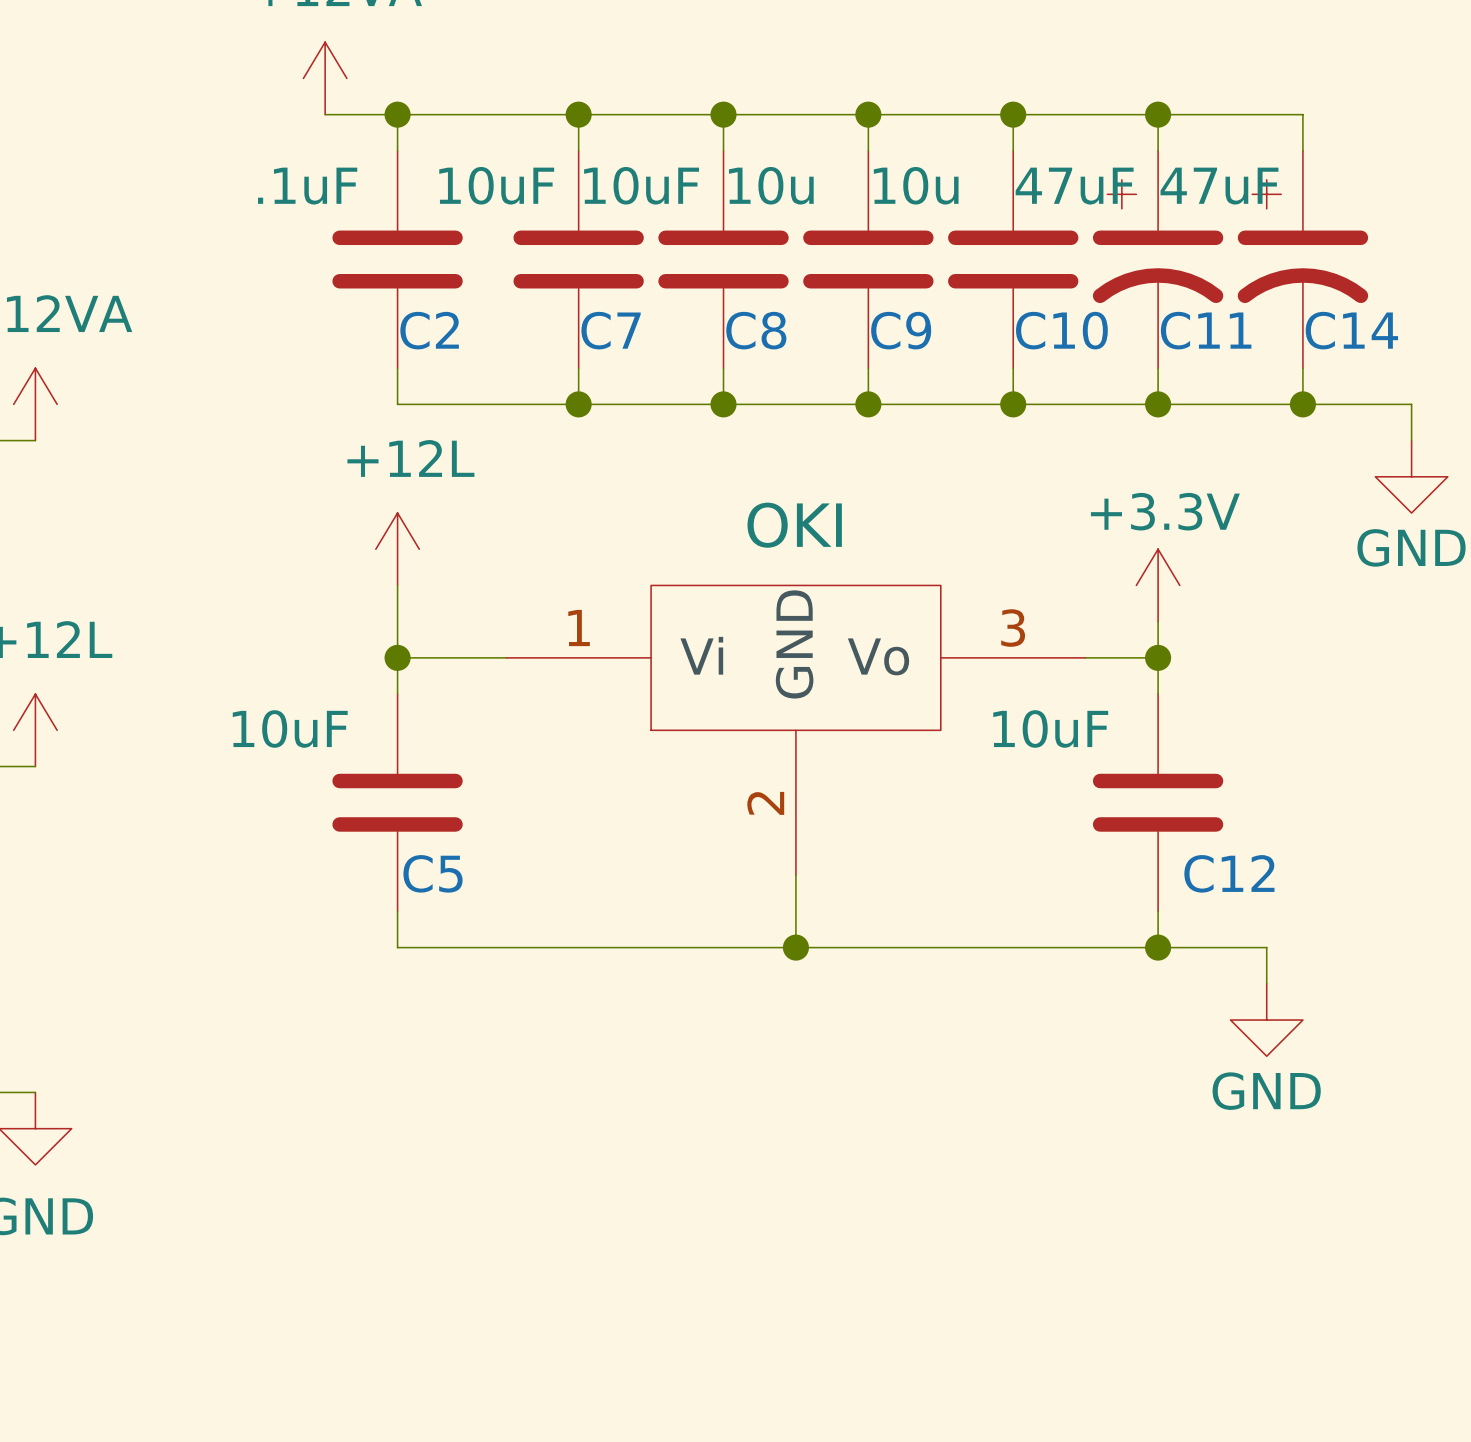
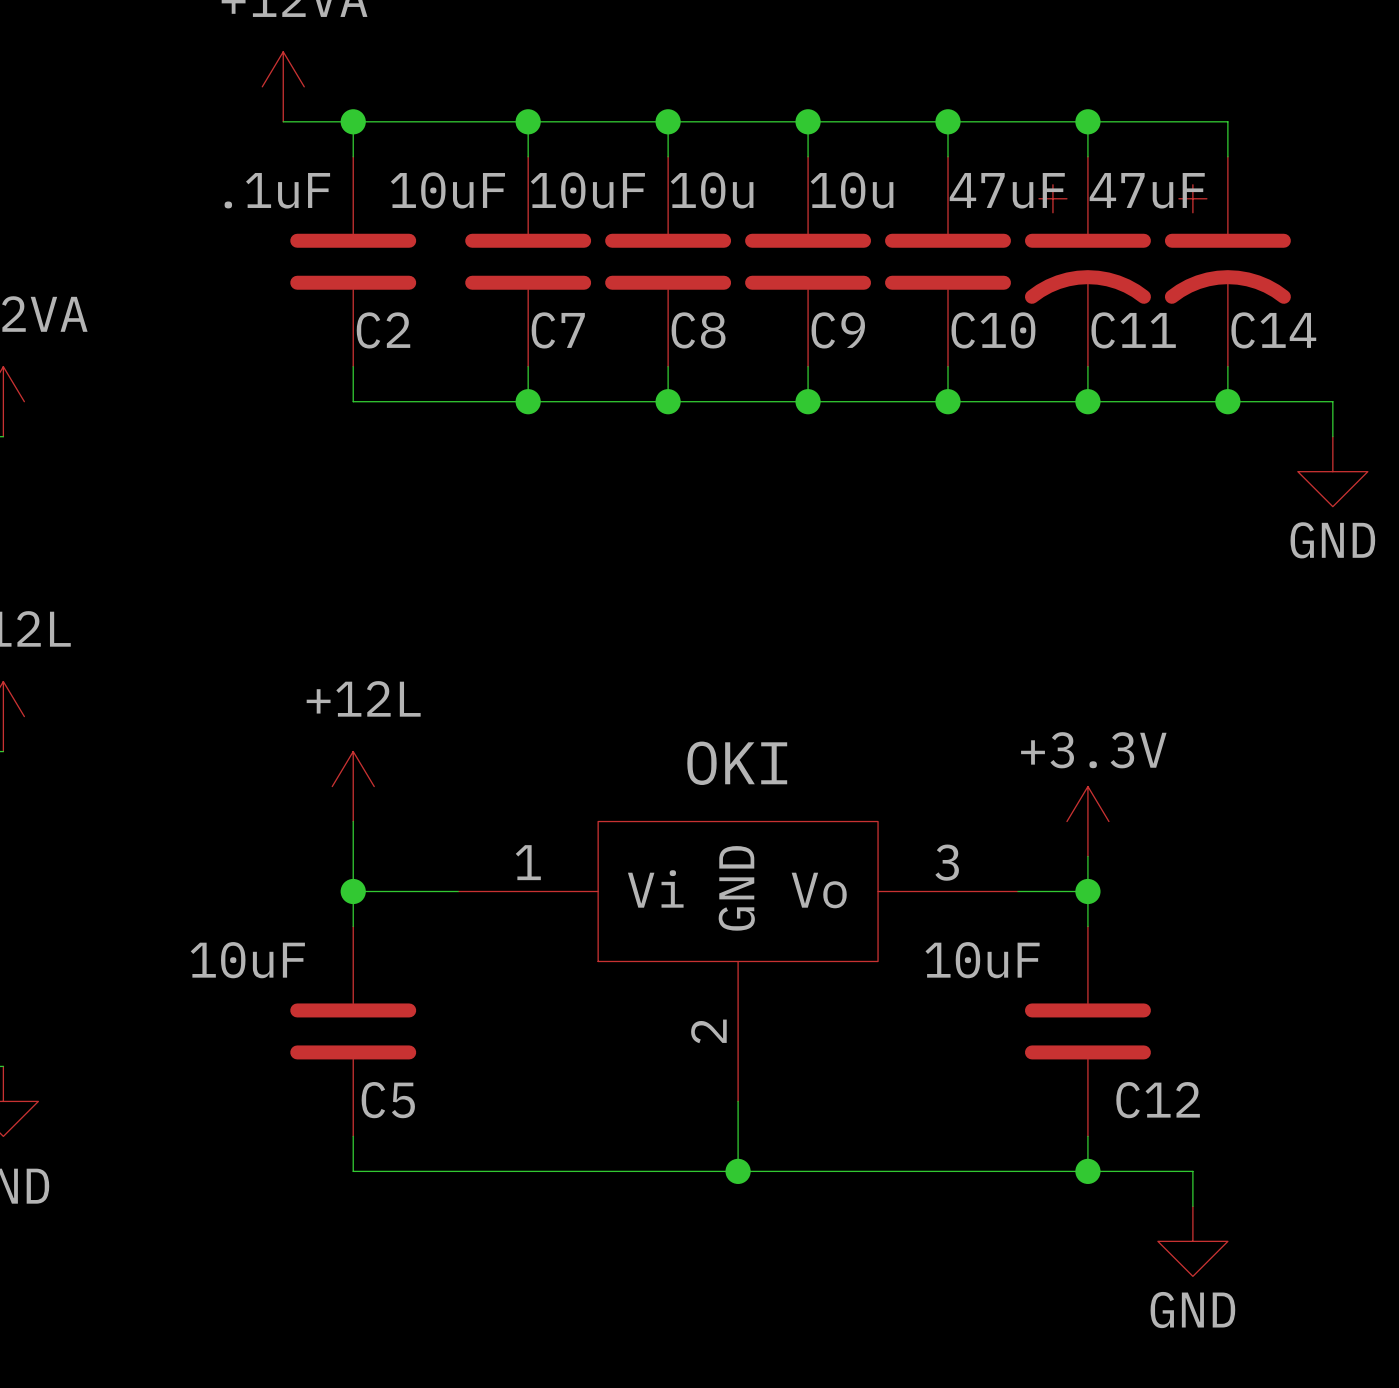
power symbol position: +12L (397, 549) -> +12L (353, 786)
wire: (397, 585) (397, 694) -> none
power symbol position: +3.3V (1158, 585) -> +3.3V (1087, 821)
wire: (1158, 621) (1158, 694) -> none
wire: (397, 657) (506, 657) -> none
junction: (397, 657) -> none
wire: (1085, 657) (1158, 657) -> none
junction: (1158, 657) -> none
part position: (795, 730) -> (738, 961)
C5 position: (397, 802) -> (353, 1031)
C12 position: (1158, 802) -> (1087, 1031)
wire: none -> (353, 821) (353, 891) (458, 891)
wire: (795, 875) (795, 947) -> (738, 1101) (738, 1171)
wire: none -> (1087, 856) (1087, 891) (1017, 891)
junction: none -> (353, 891)
wire: (397, 947) (1266, 947) (1266, 983) -> none
junction: (795, 947) -> none
junction position: (1158, 947) -> (1087, 891)
power symbol position: GND (1266, 1020) -> GND (1192, 1241)
wire: none -> (353, 1136) (353, 1171) (1192, 1171) (1192, 1206)
wire: none -> (1087, 1136) (1087, 1171)
junction: none -> (738, 1171)
junction: none -> (1087, 1171)

